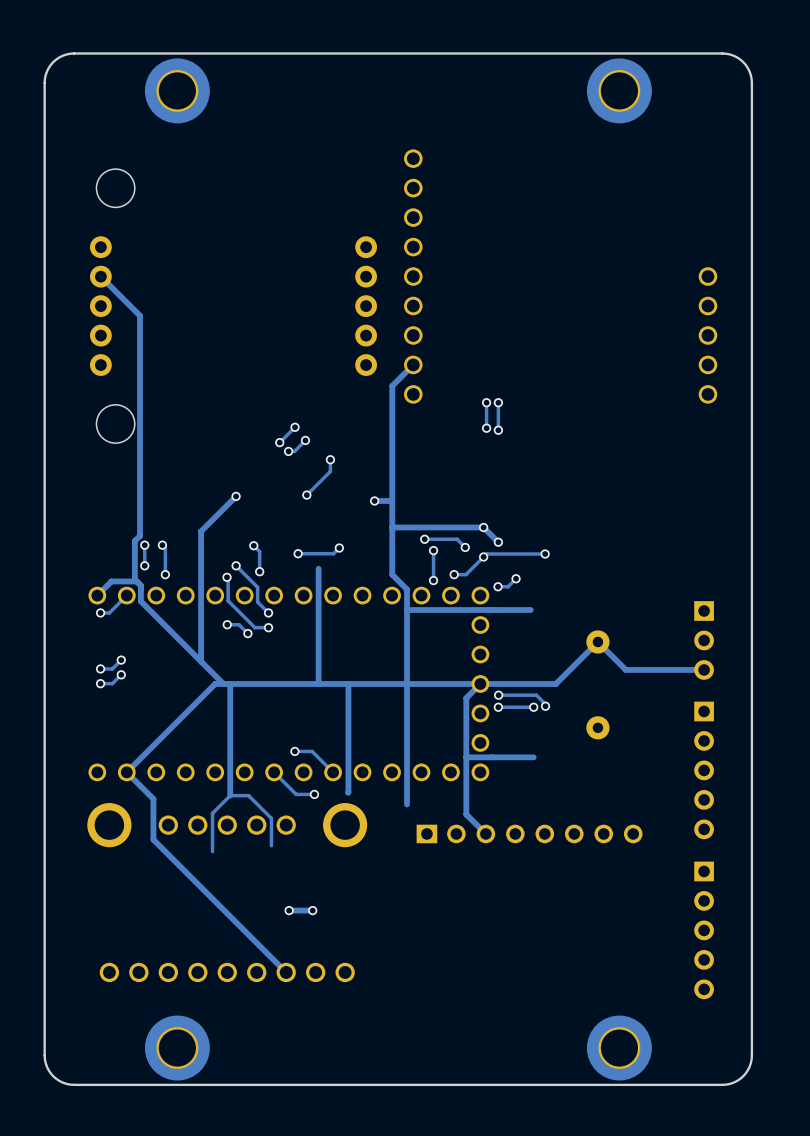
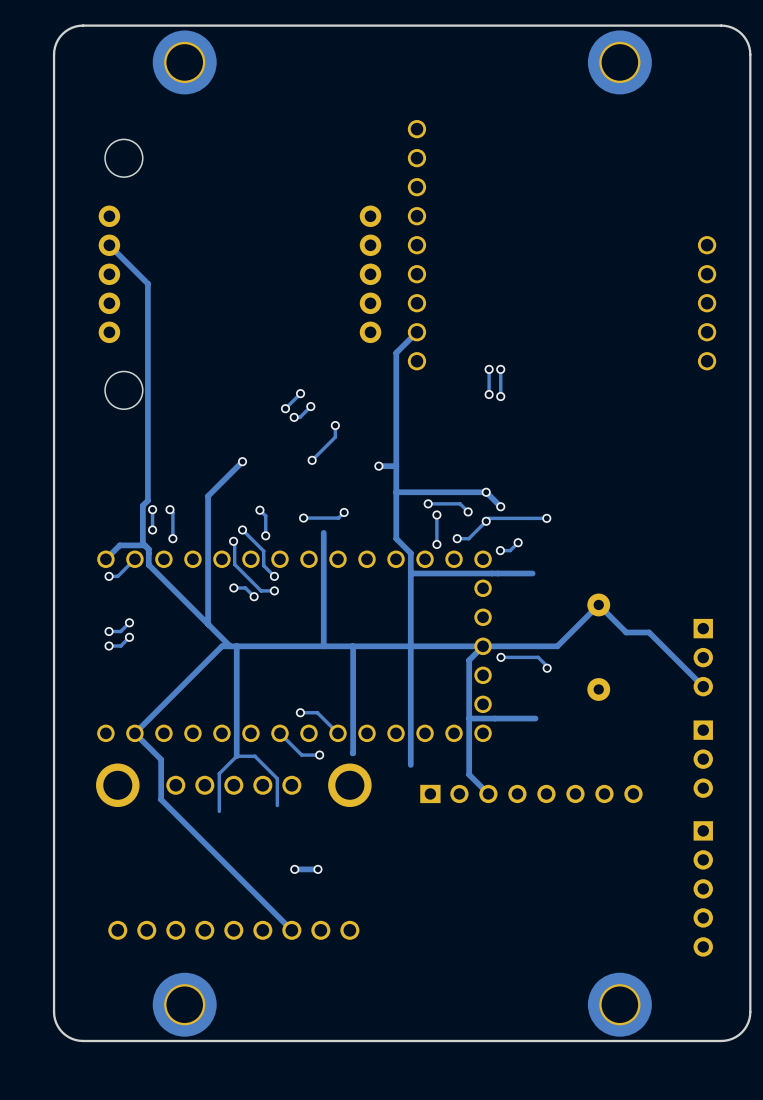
part position: (704, 640) -> (703, 657)
track: (704, 669) (649, 669) -> (703, 686) (649, 632)
via: (498, 707) -> none
track: (533, 707) (498, 707) -> none
via: (533, 707) -> none
part: (704, 770) -> none
part: none -> (703, 759)

